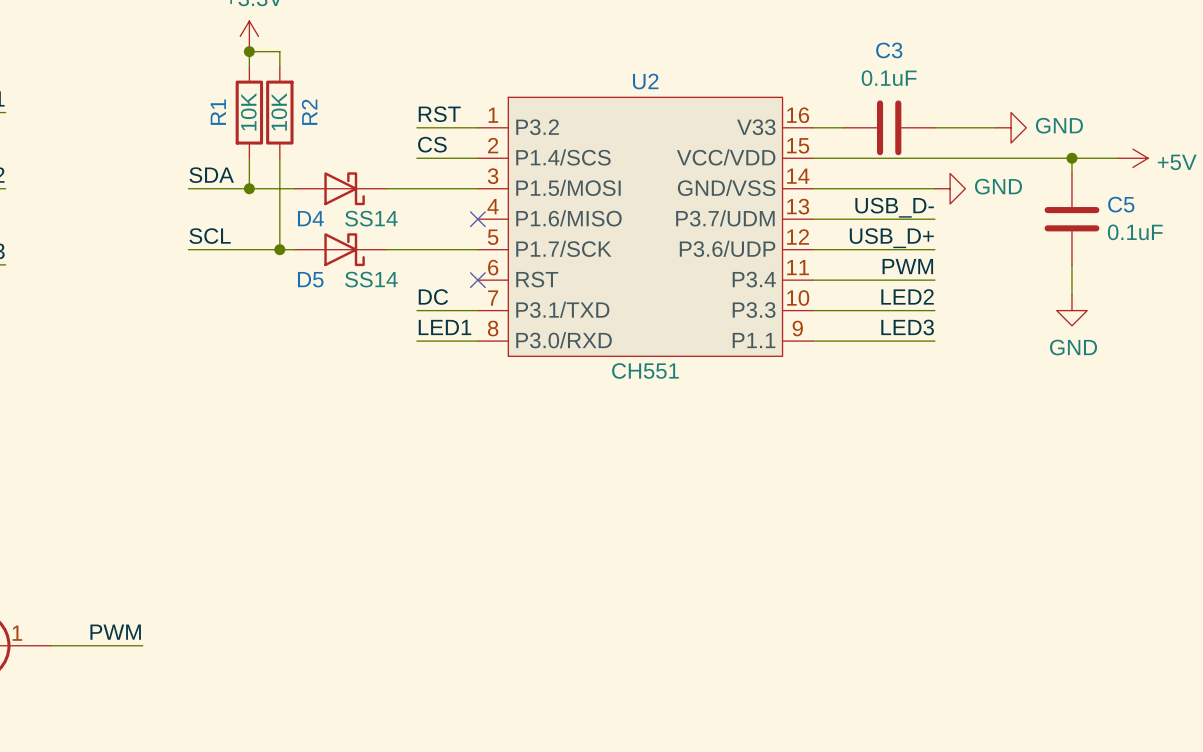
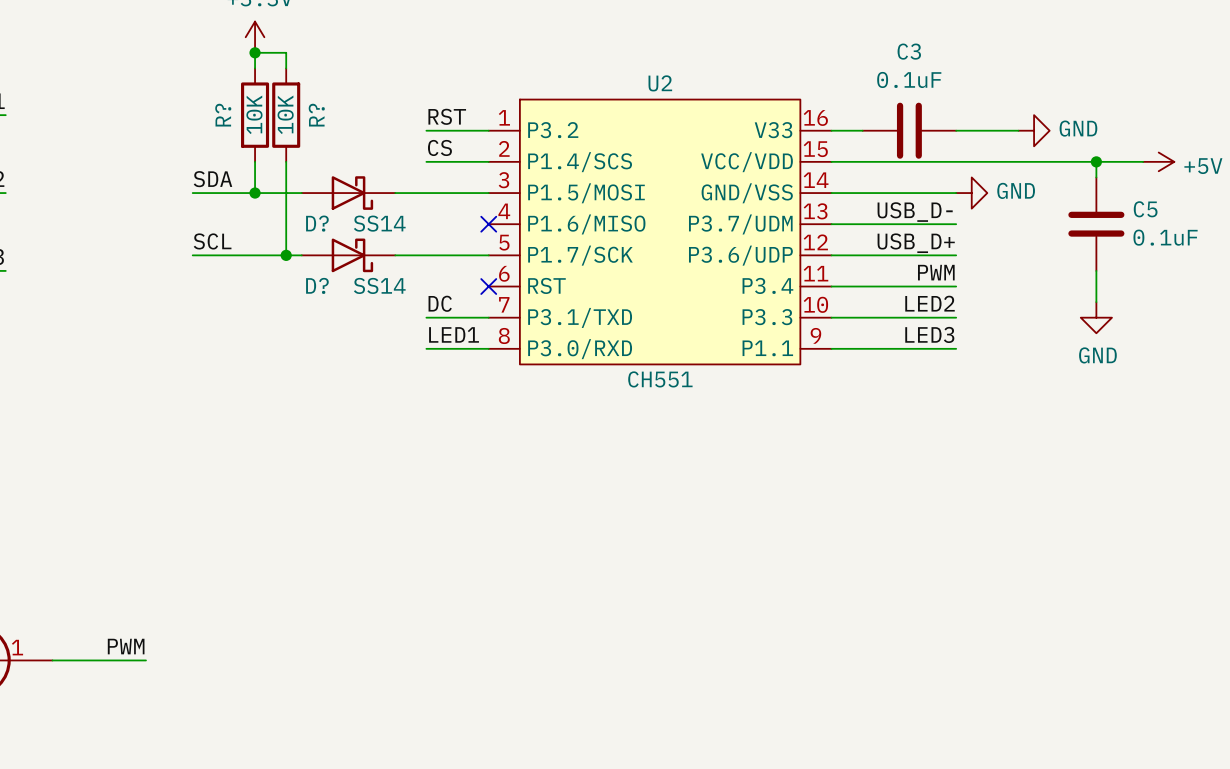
R1 name: R1 (218, 112) -> R? (223, 115)
R2 name: R2 (309, 112) -> R? (316, 115)
D4 name: D4 (310, 218) -> D? (317, 223)
D5 name: D5 (310, 279) -> D? (317, 285)

